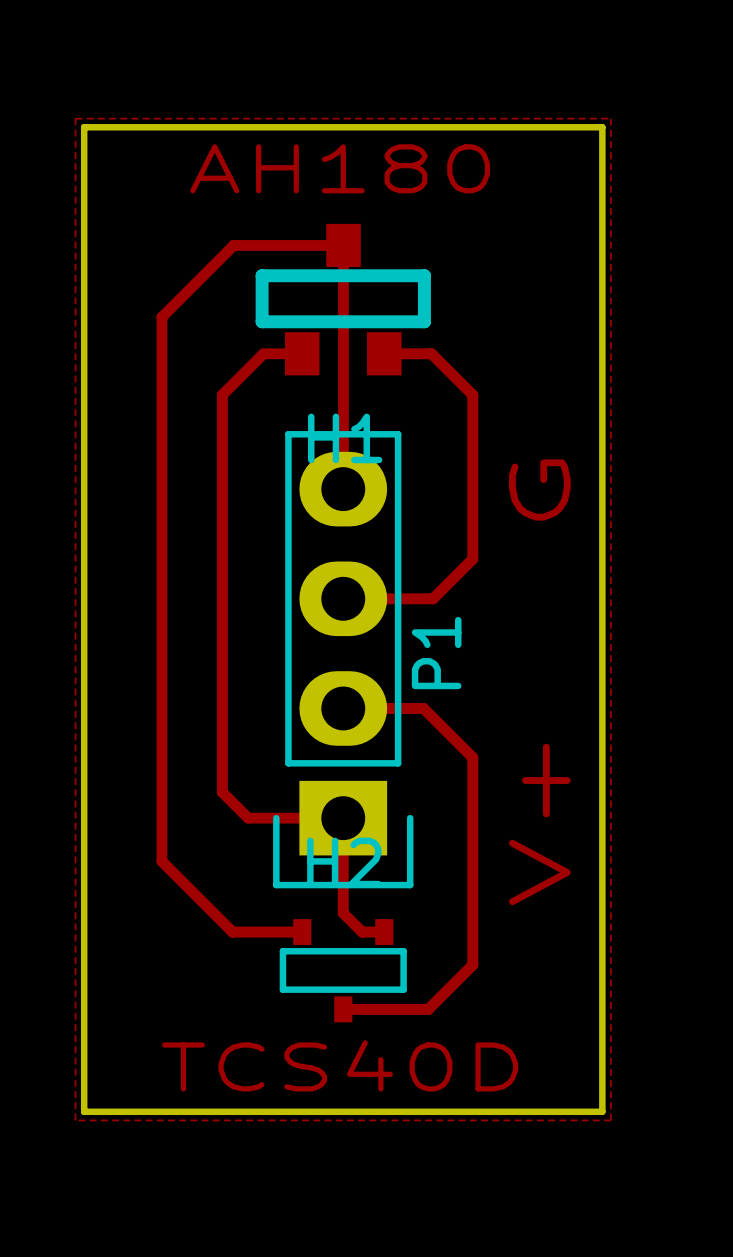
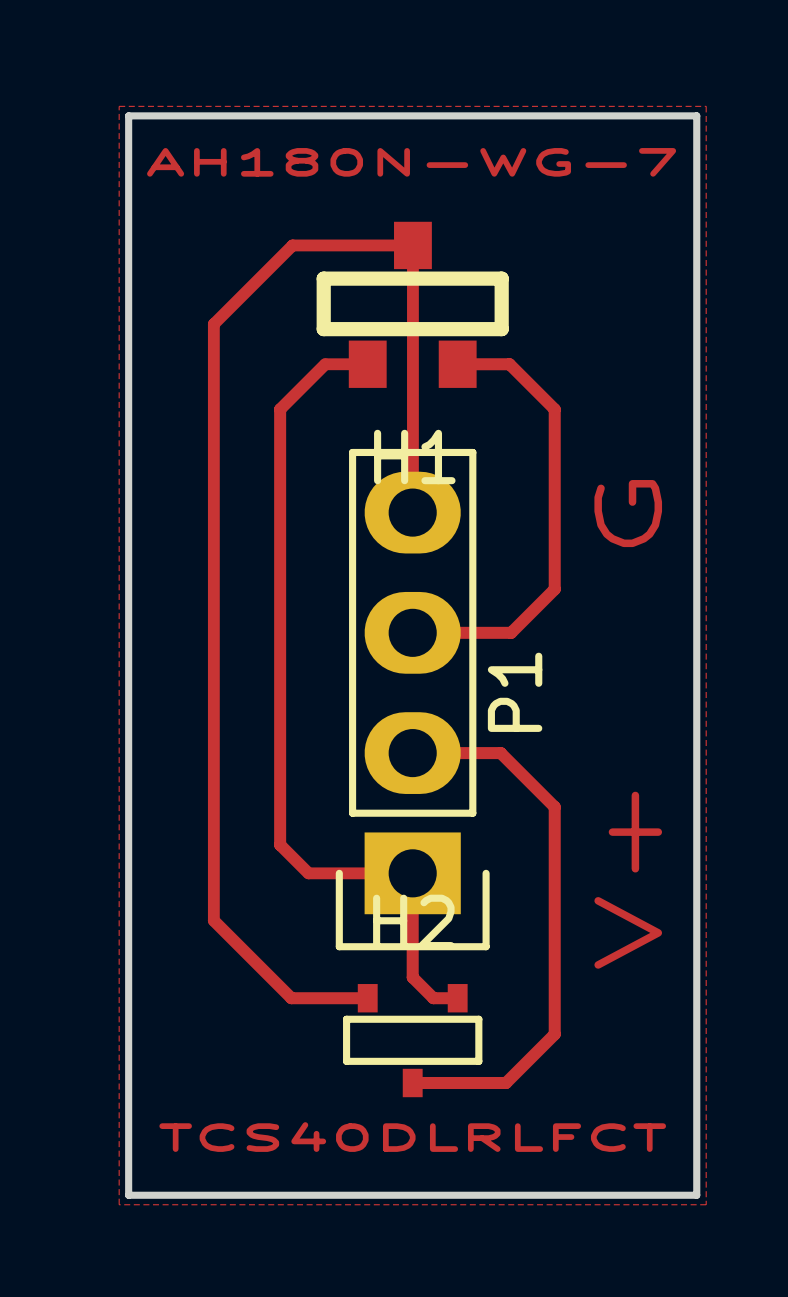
text: AH180 (340, 168) -> AH180N-WG-7 (411, 162)
text: TCS40D (340, 1065) -> TCS40DLRLFCT (412, 1137)

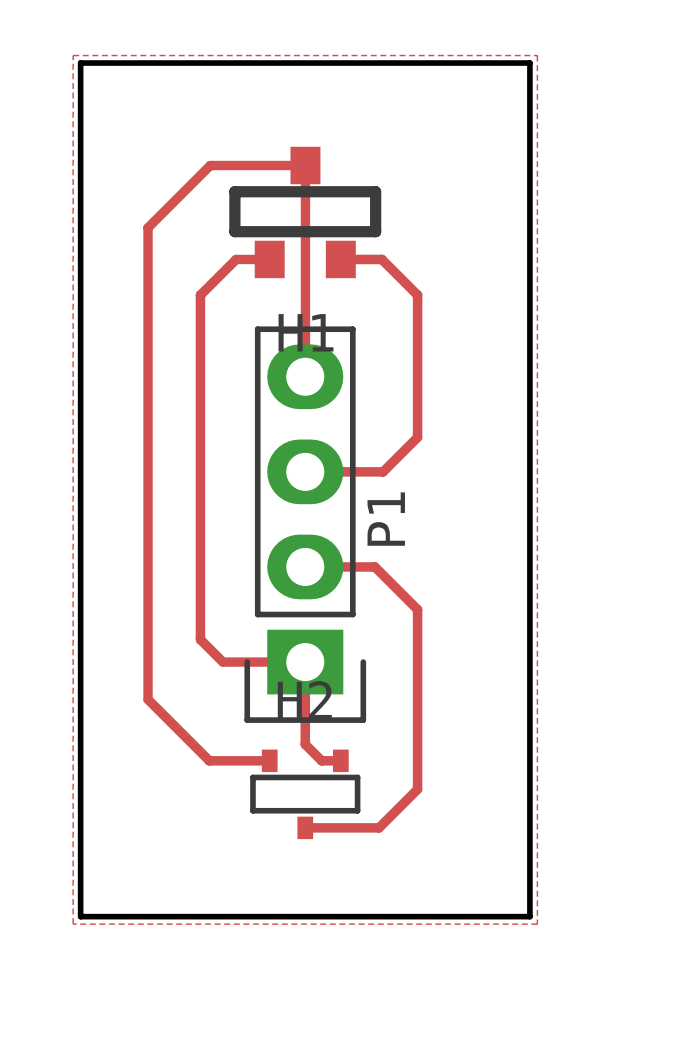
text: AH180N-WG-7 (411, 162) -> none
text: G (628, 513) -> none
text: V+ (628, 880) -> none
text: TCS40DLRLFCT (412, 1137) -> none

